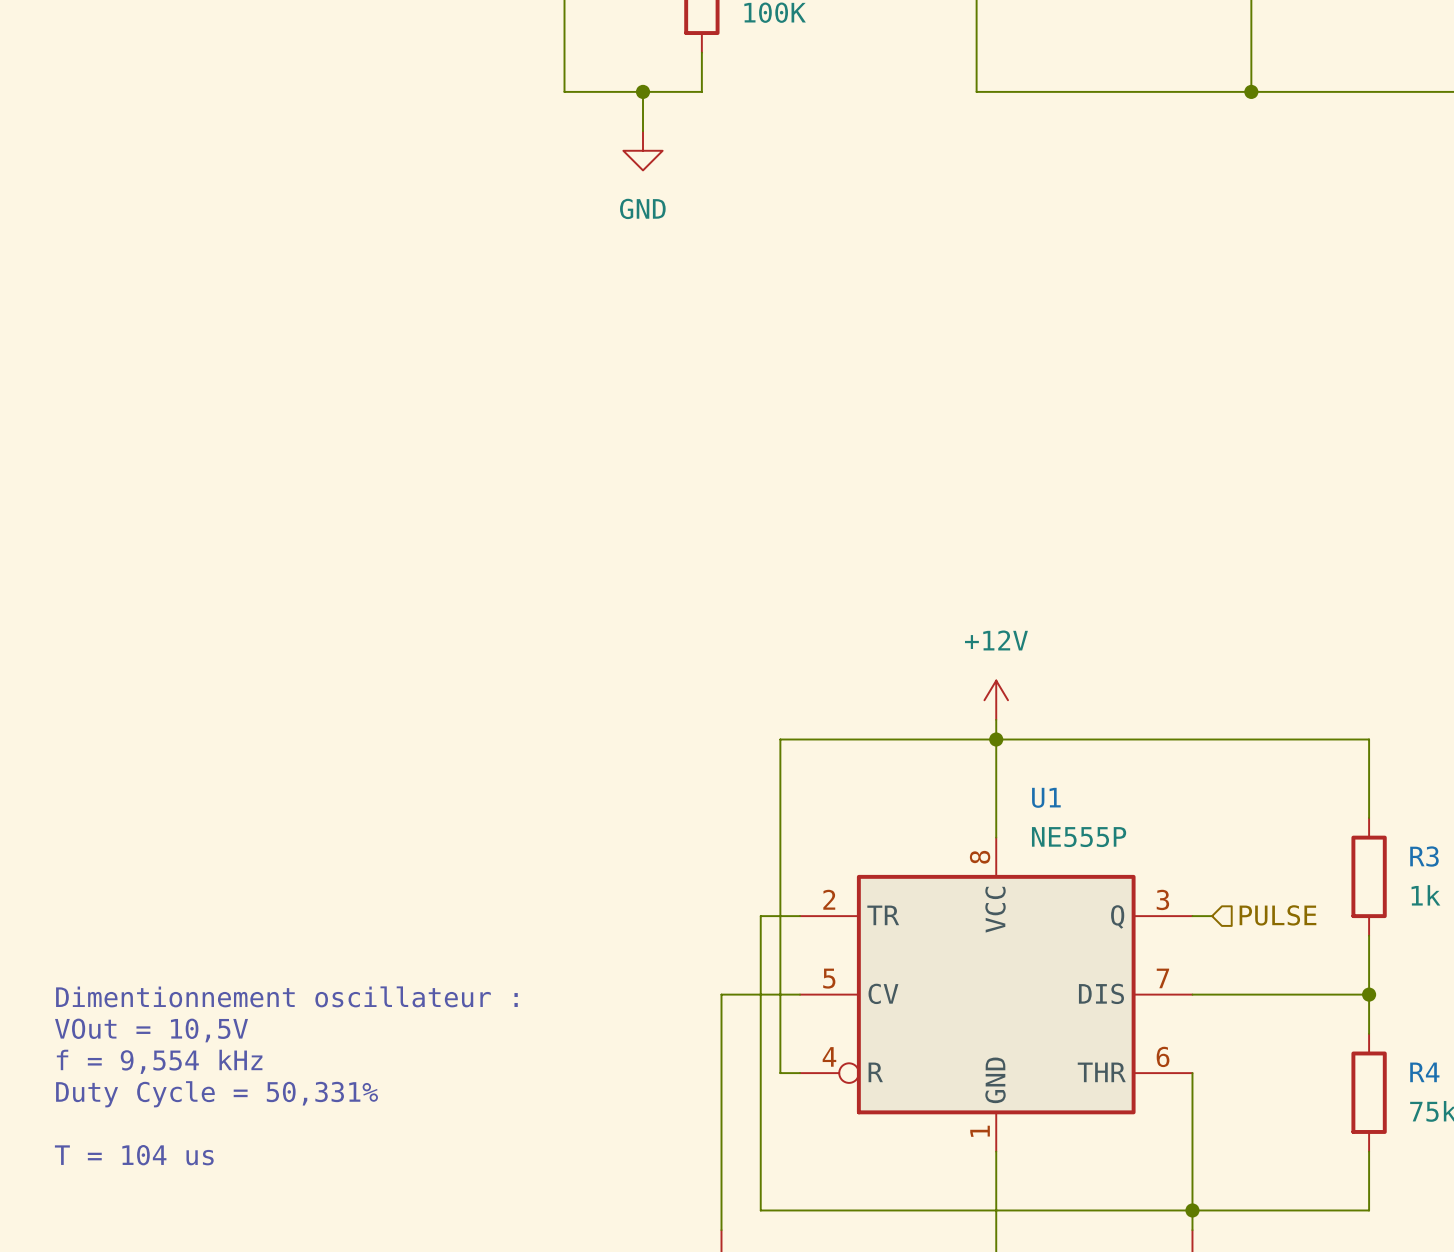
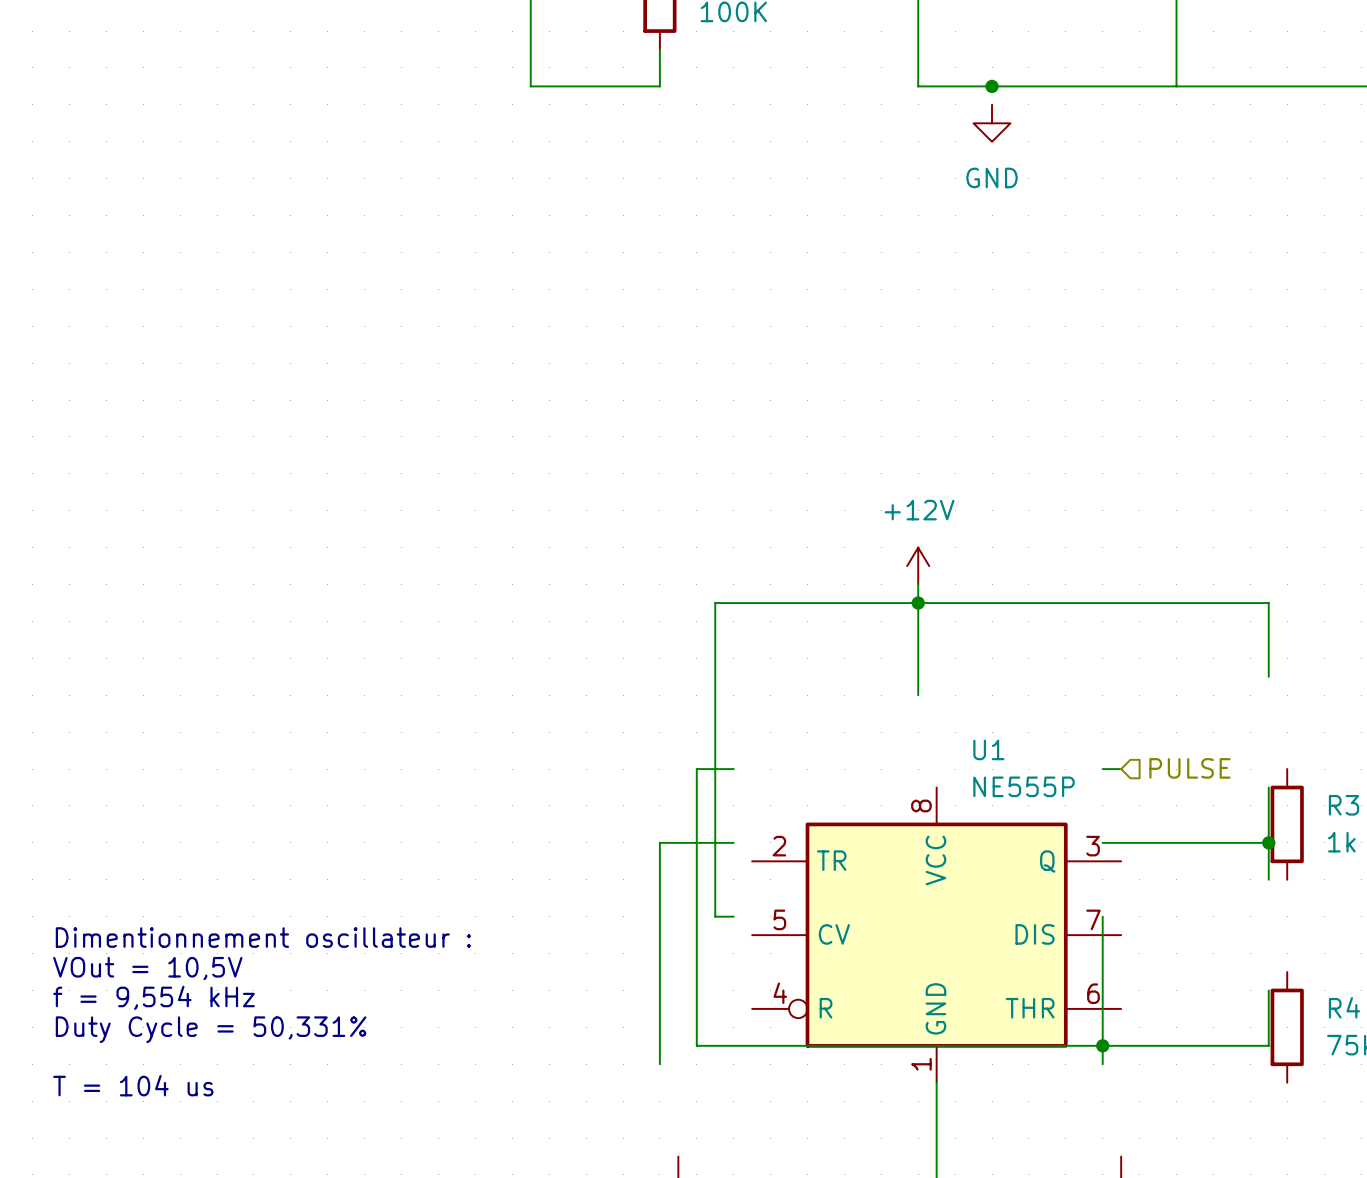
wire: (643, 91) (643, 131) -> none
junction: (643, 91) -> none
junction: none -> (992, 86)
junction: (1251, 91) -> none
power symbol: none -> GND (992, 123)
power symbol: GND (643, 150) -> none
junction: none -> (918, 603)
power symbol position: +12V (996, 700) -> +12V (918, 566)
wire: (996, 719) (996, 837) -> (918, 584) (918, 695)
junction: (996, 739) -> none
wire: none -> (733, 769) (696, 769) (696, 1045) (1268, 1045) (1268, 990)
wire: (1369, 817) (1369, 739) (780, 739) (780, 1073) (799, 1073) -> none
junction: none -> (1268, 842)
hierarchical label position: PULSE (1277, 915) -> PULSE (1189, 768)
wire: (760, 916) (799, 916) -> (715, 861) (715, 603) (1268, 603) (1268, 676)
wire: (1192, 916) (1212, 916) -> (1102, 769) (1121, 769)
wire: (1369, 935) (1369, 1033) -> (1268, 787) (1268, 879)
wire: (760, 974) (760, 1210) (1369, 1210) (1369, 1151) -> (715, 916) (733, 916)
wire: (799, 994) (721, 994) (721, 1230) -> (733, 842) (659, 842) (659, 1064)
wire: (1192, 994) (1369, 994) -> (1102, 842) (1268, 842)
junction: (1369, 994) -> none
wire: (1192, 1073) (1192, 1230) -> (1102, 916) (1102, 1064)
junction: none -> (1102, 1045)
junction: (1192, 1210) -> none

